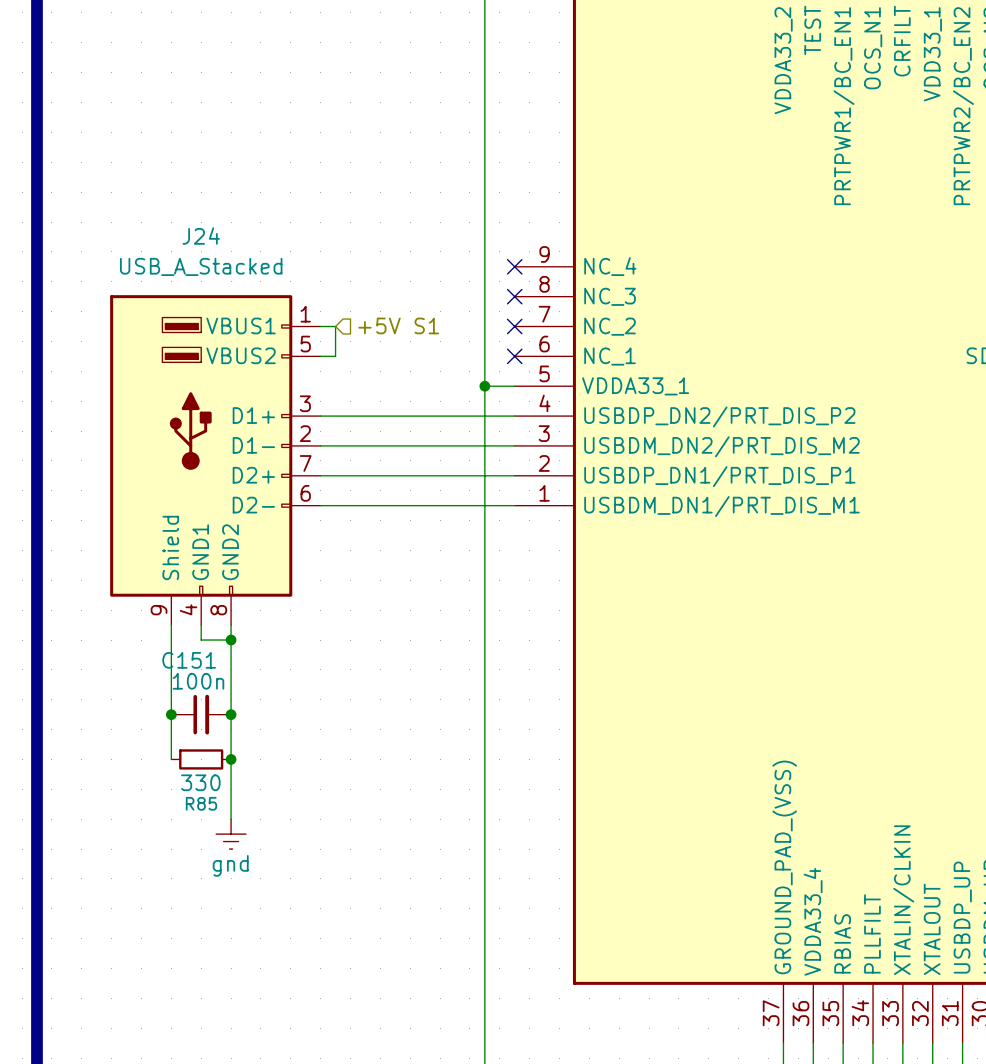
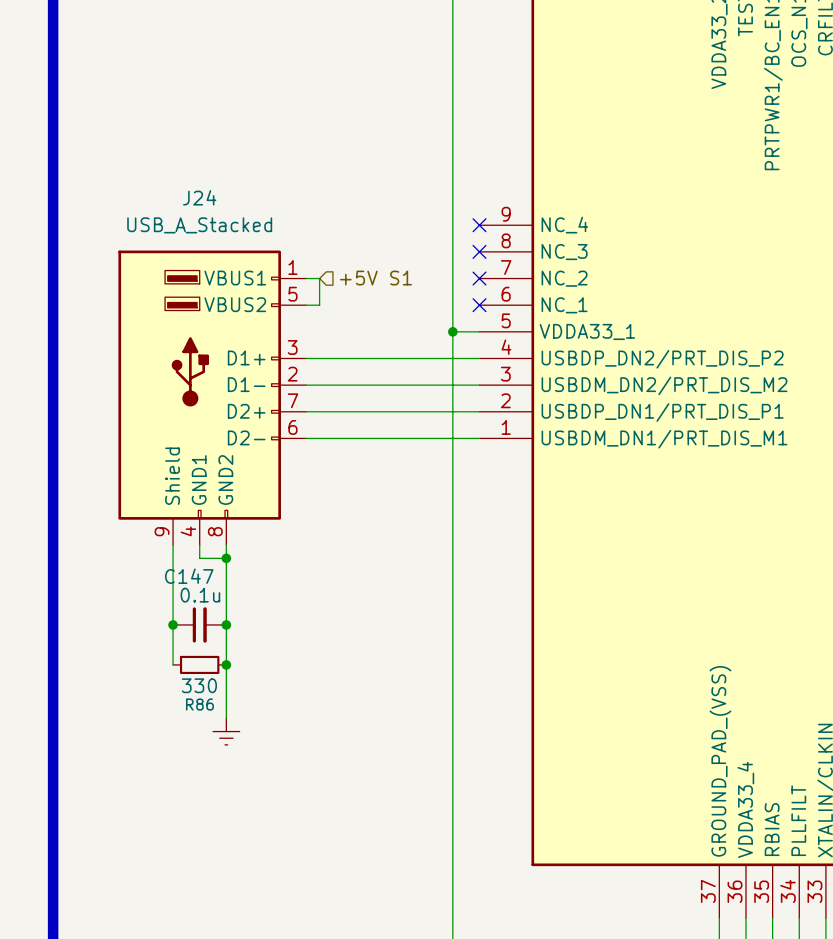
C151 name: C151 (189, 660) -> C147 (189, 576)
C151 value: 100n (198, 681) -> 0.1u (200, 595)
R85 name: R85 (201, 803) -> R86 (199, 704)
power symbol text: gnd (230, 865) -> none

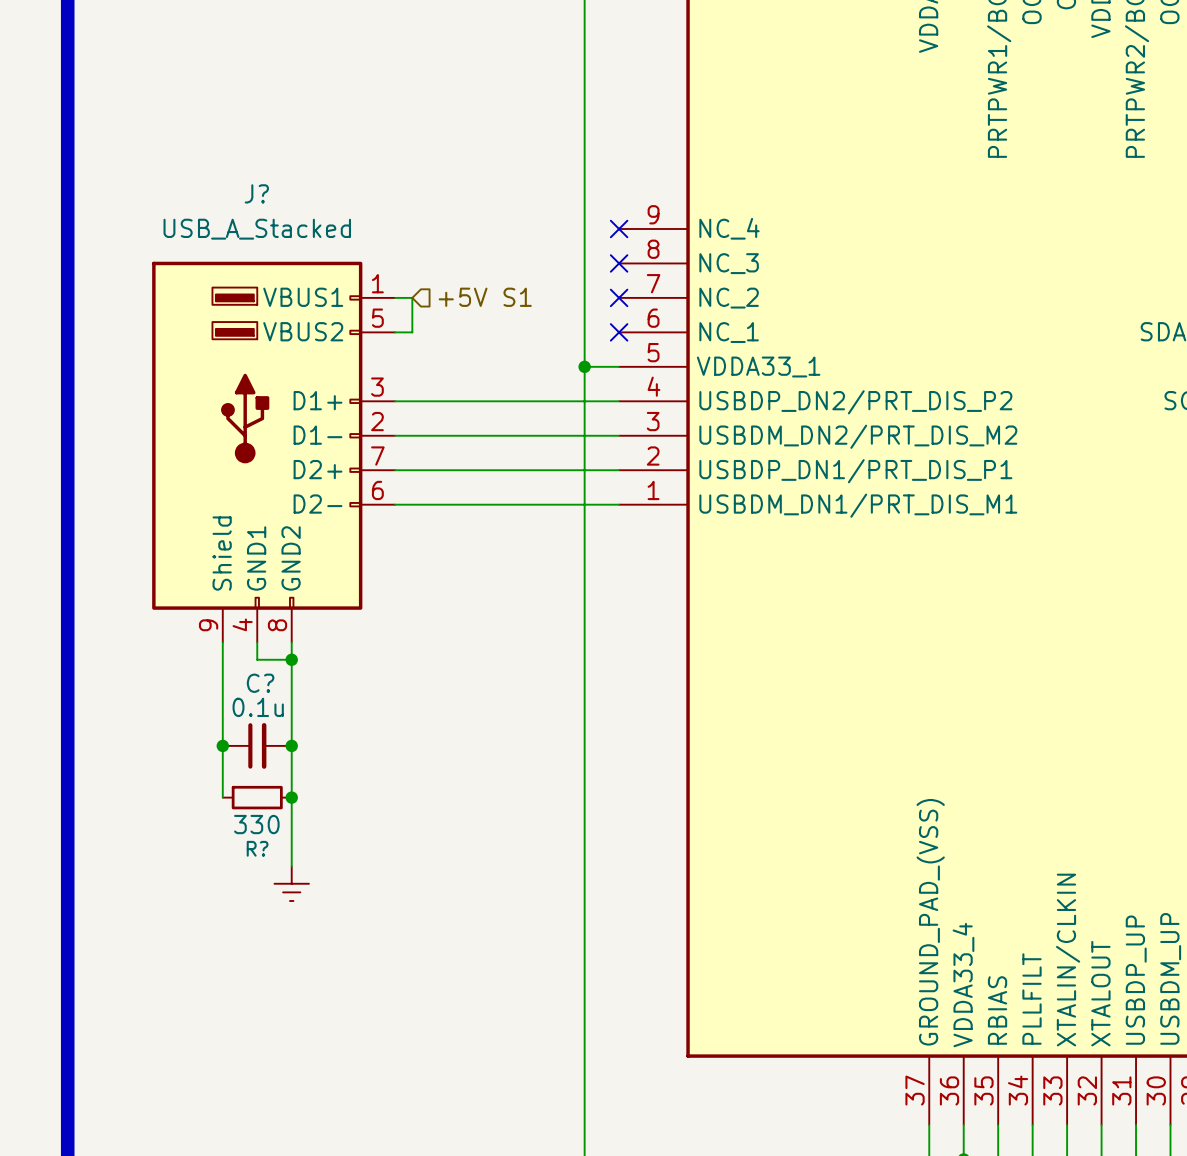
J24 name: J24 (199, 197) -> J? (256, 193)
C147 name: C147 (189, 576) -> C? (260, 683)
R86 name: R86 (199, 704) -> R? (257, 848)

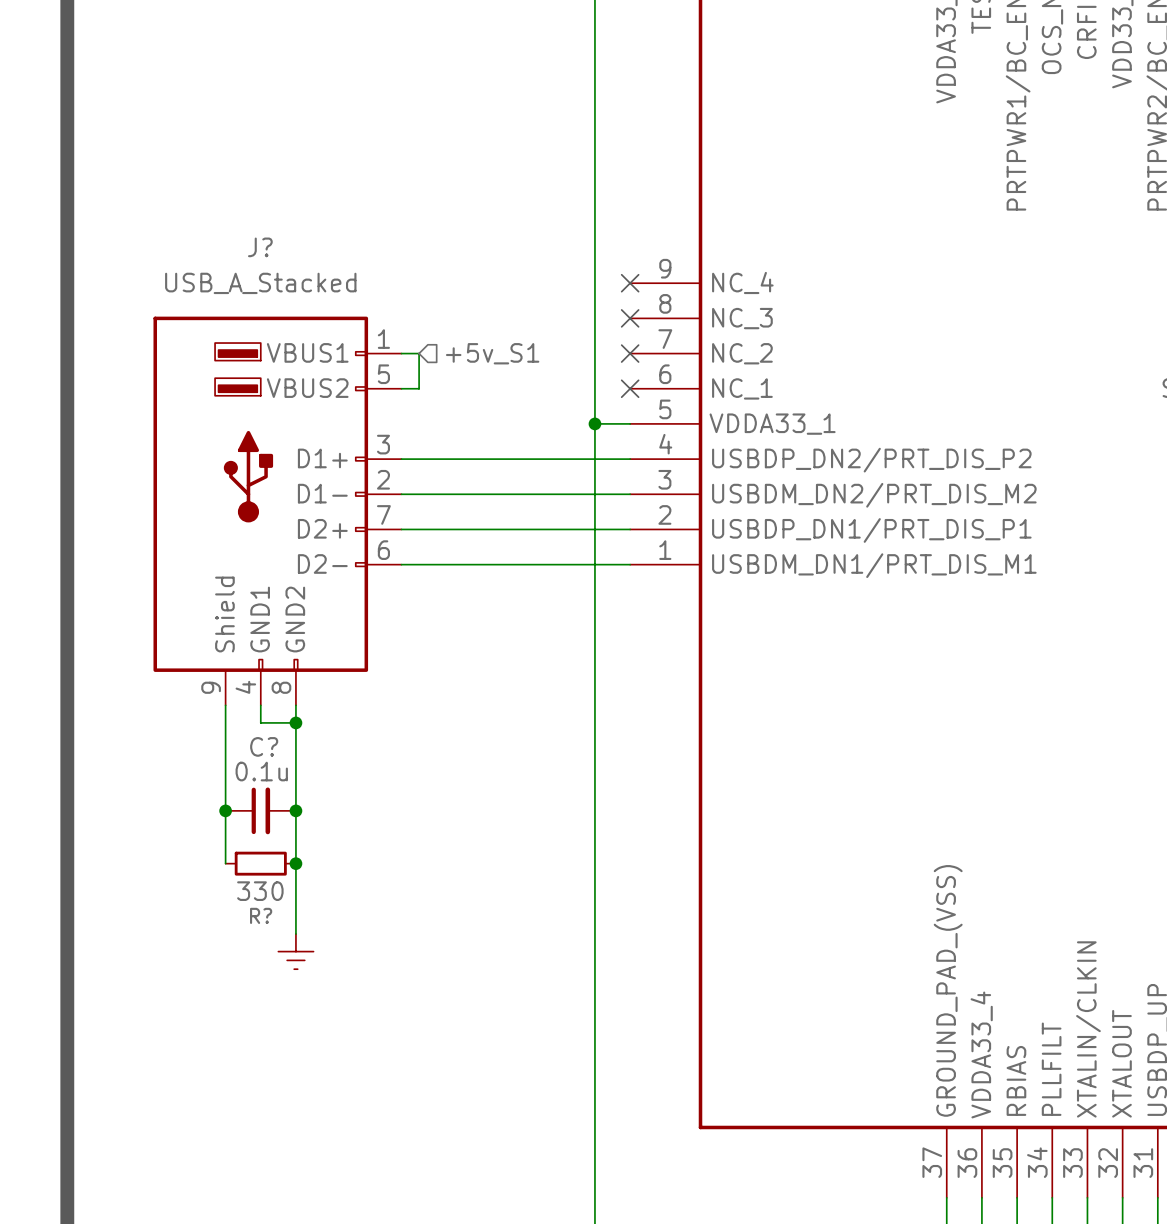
hierarchical label: +5V S1 (485, 297) -> +5v_S1 (492, 353)

